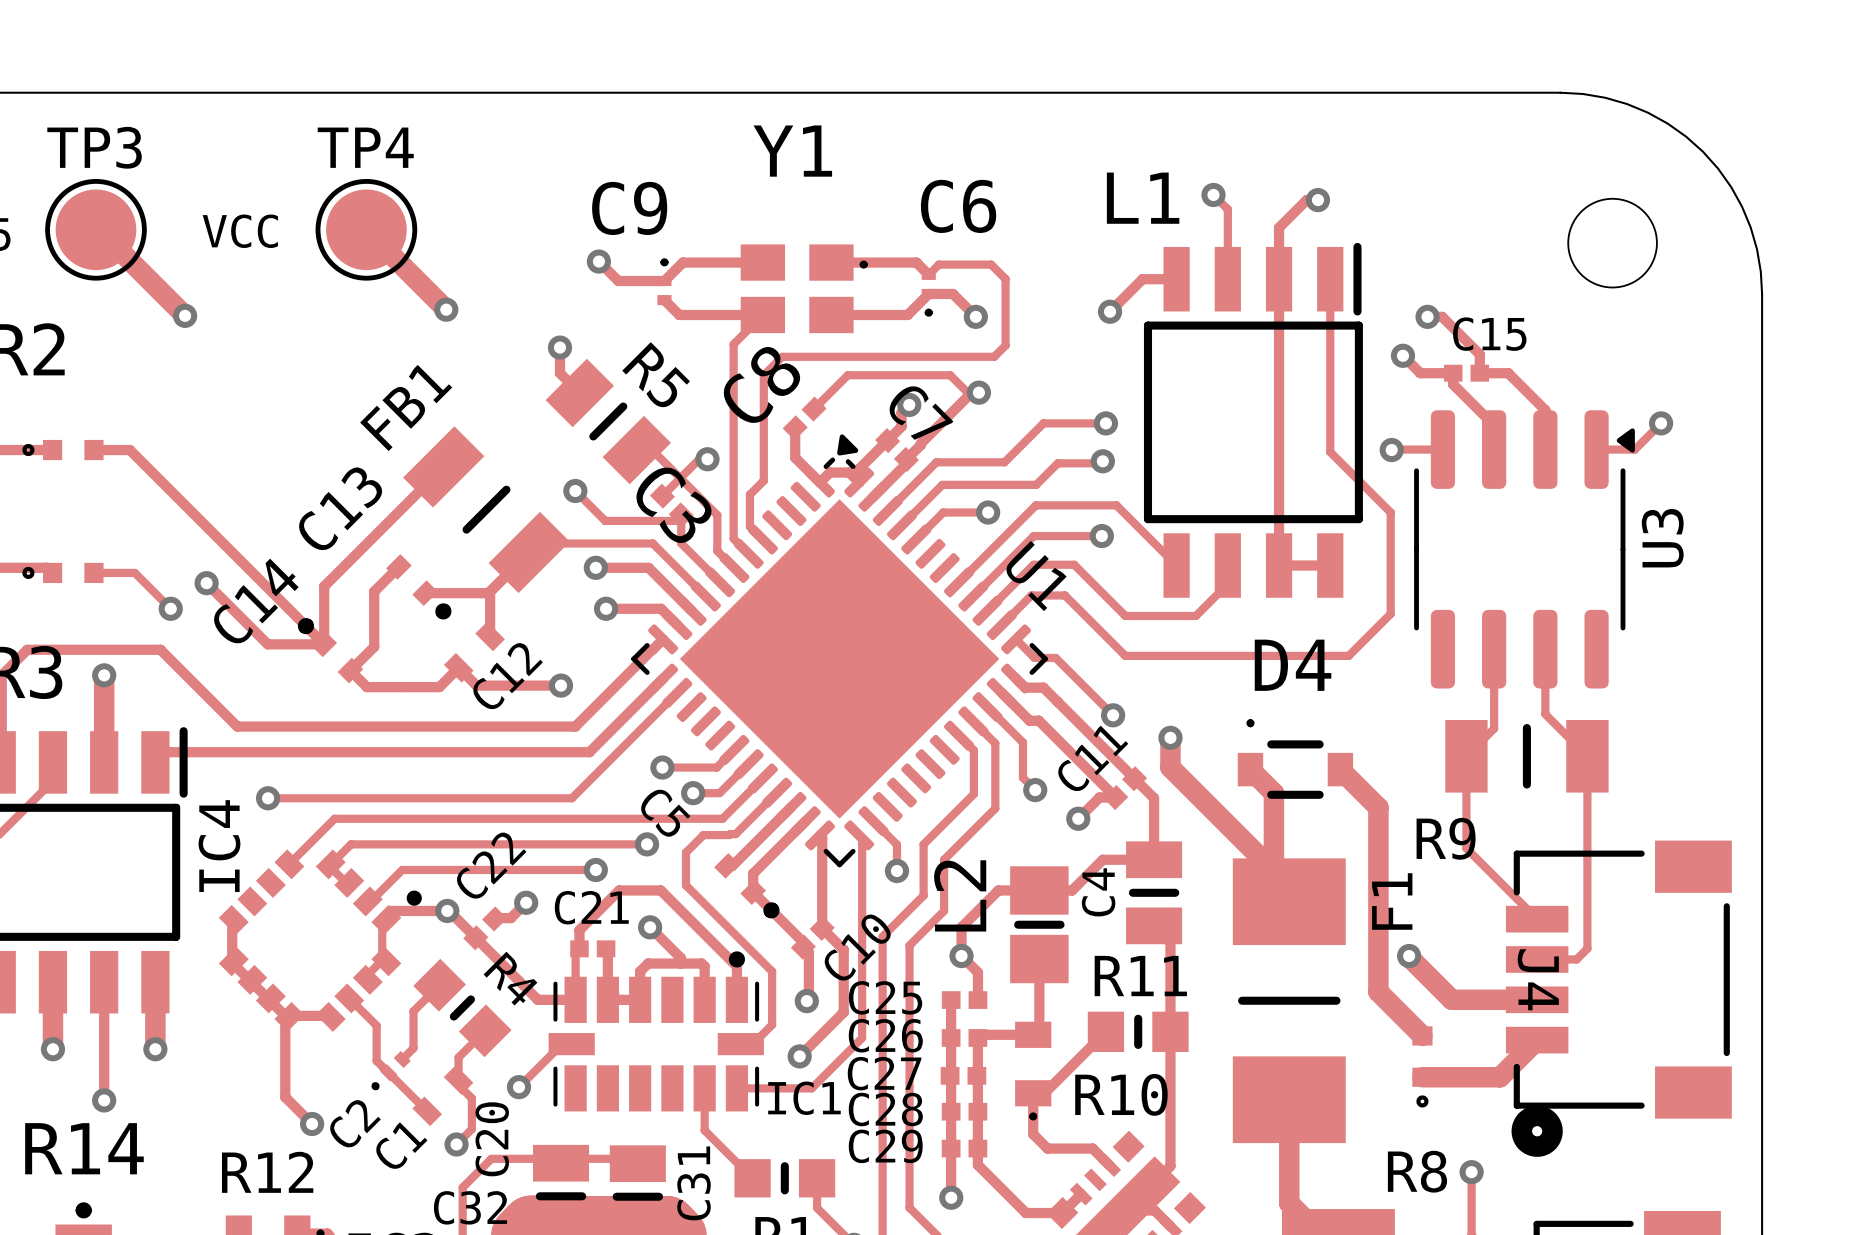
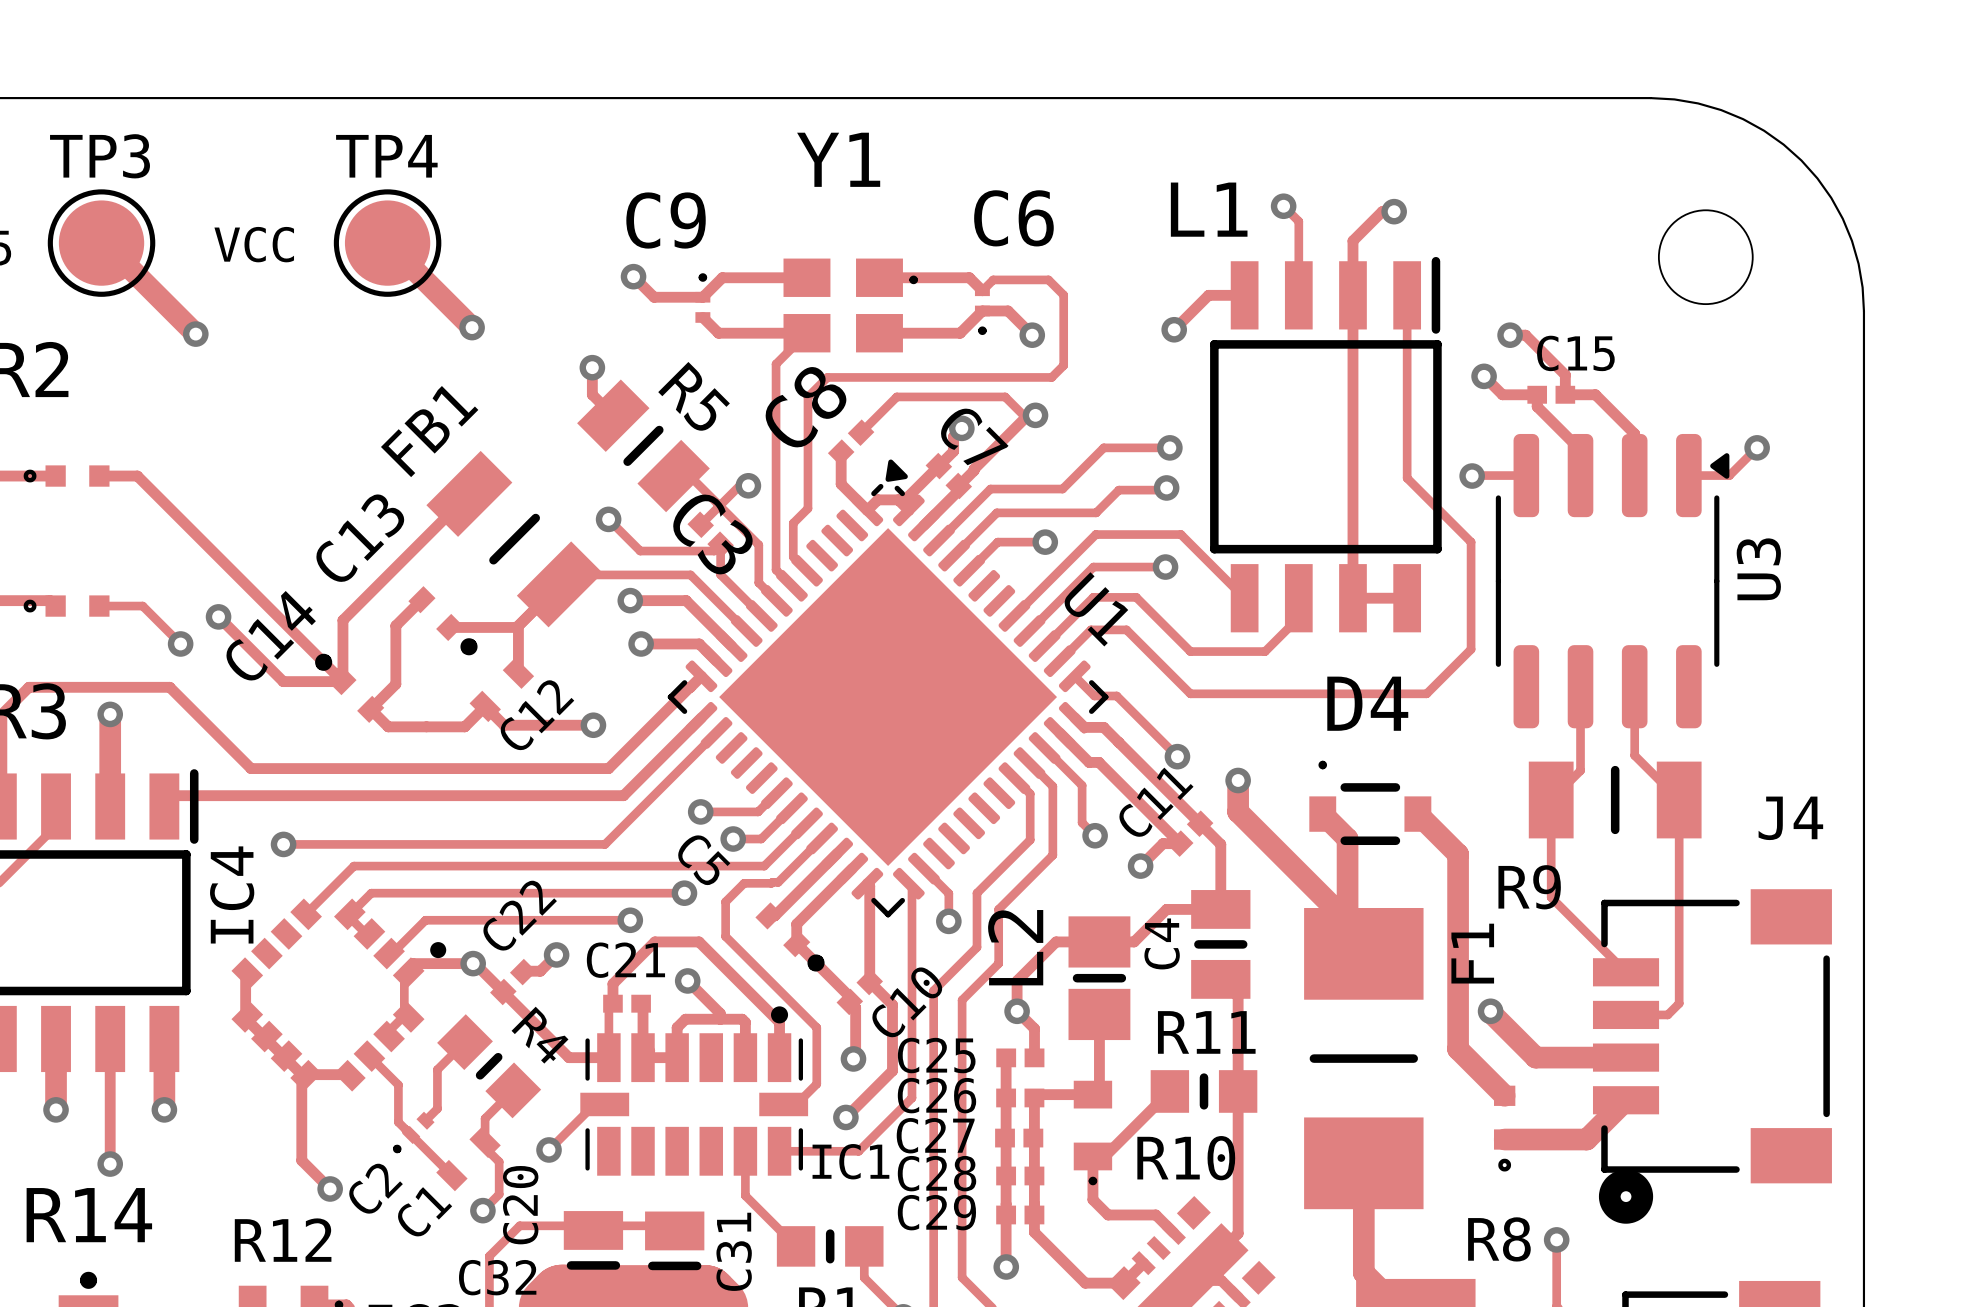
J4 name rotation: 0° (1538, 979) -> 90° counterclockwise (1790, 818)
J4 name position: J4 (1538, 979) -> J4 (1790, 818)

